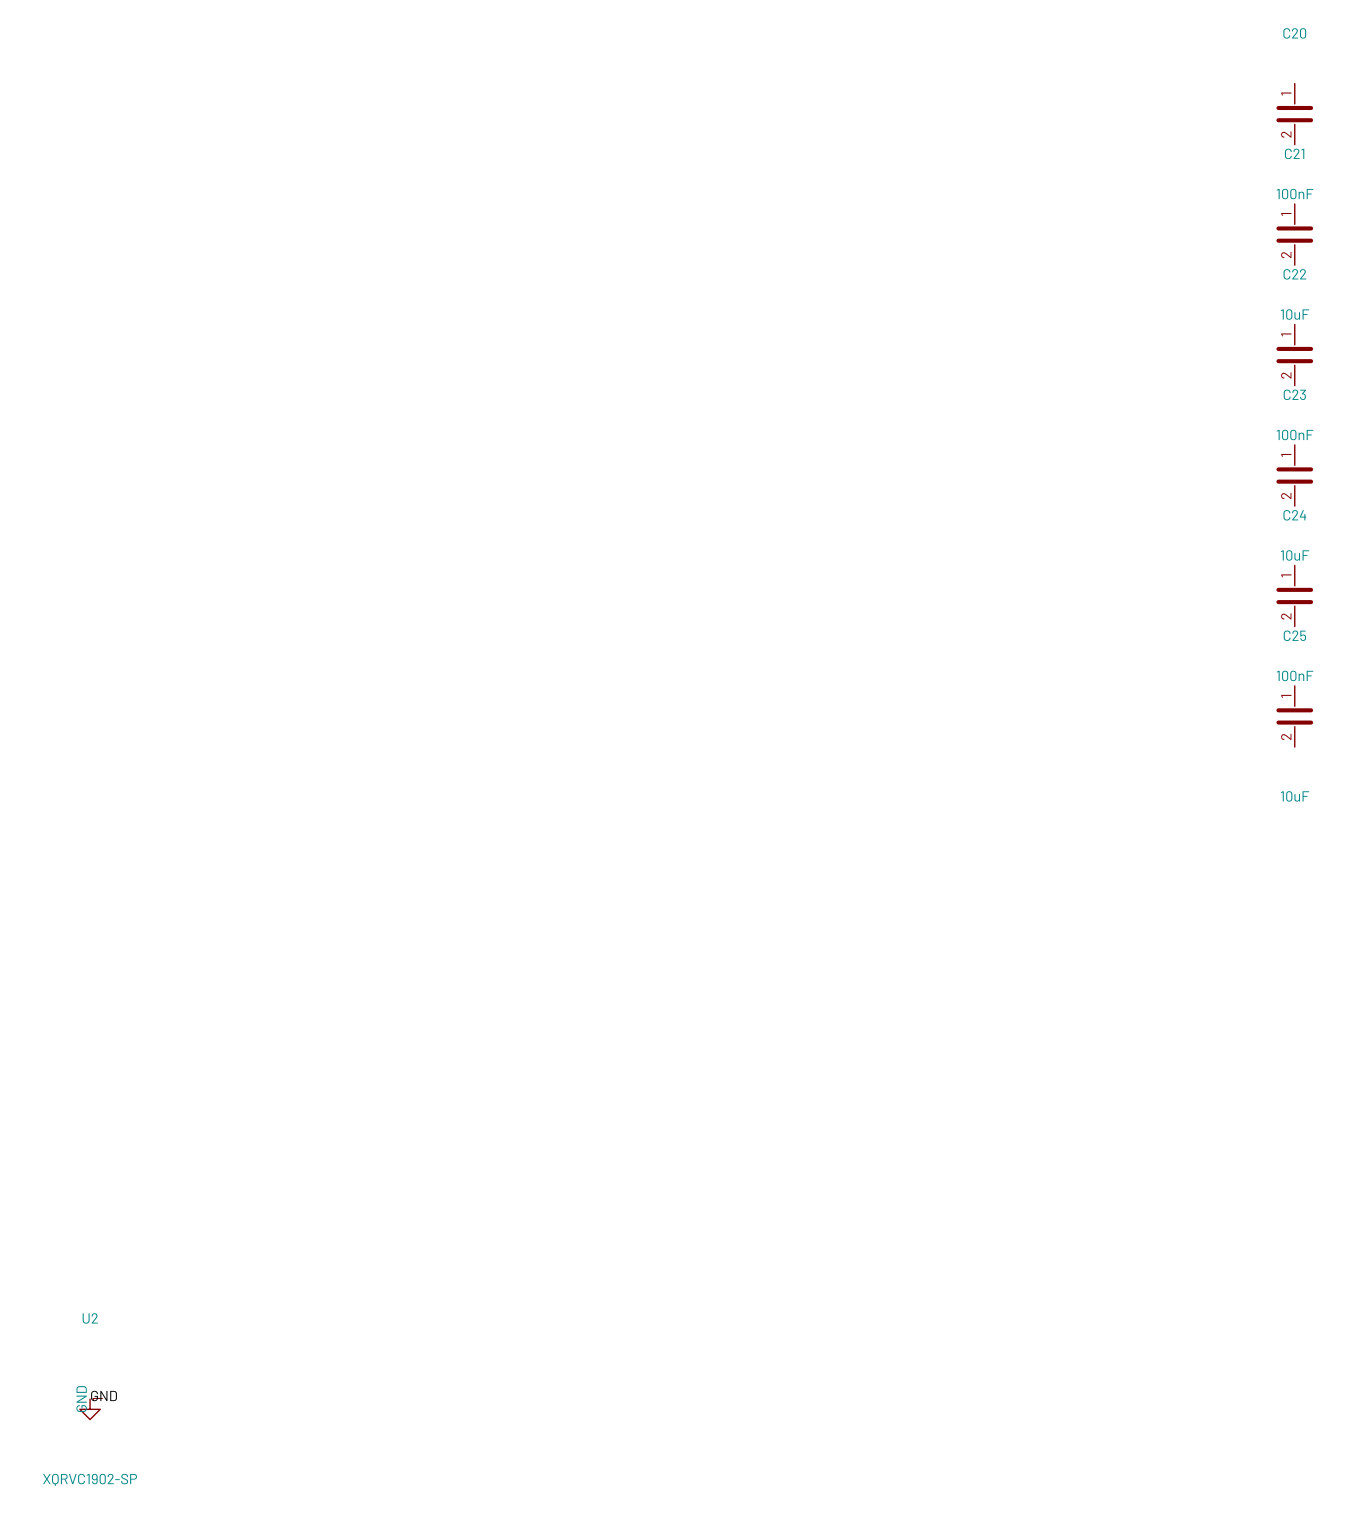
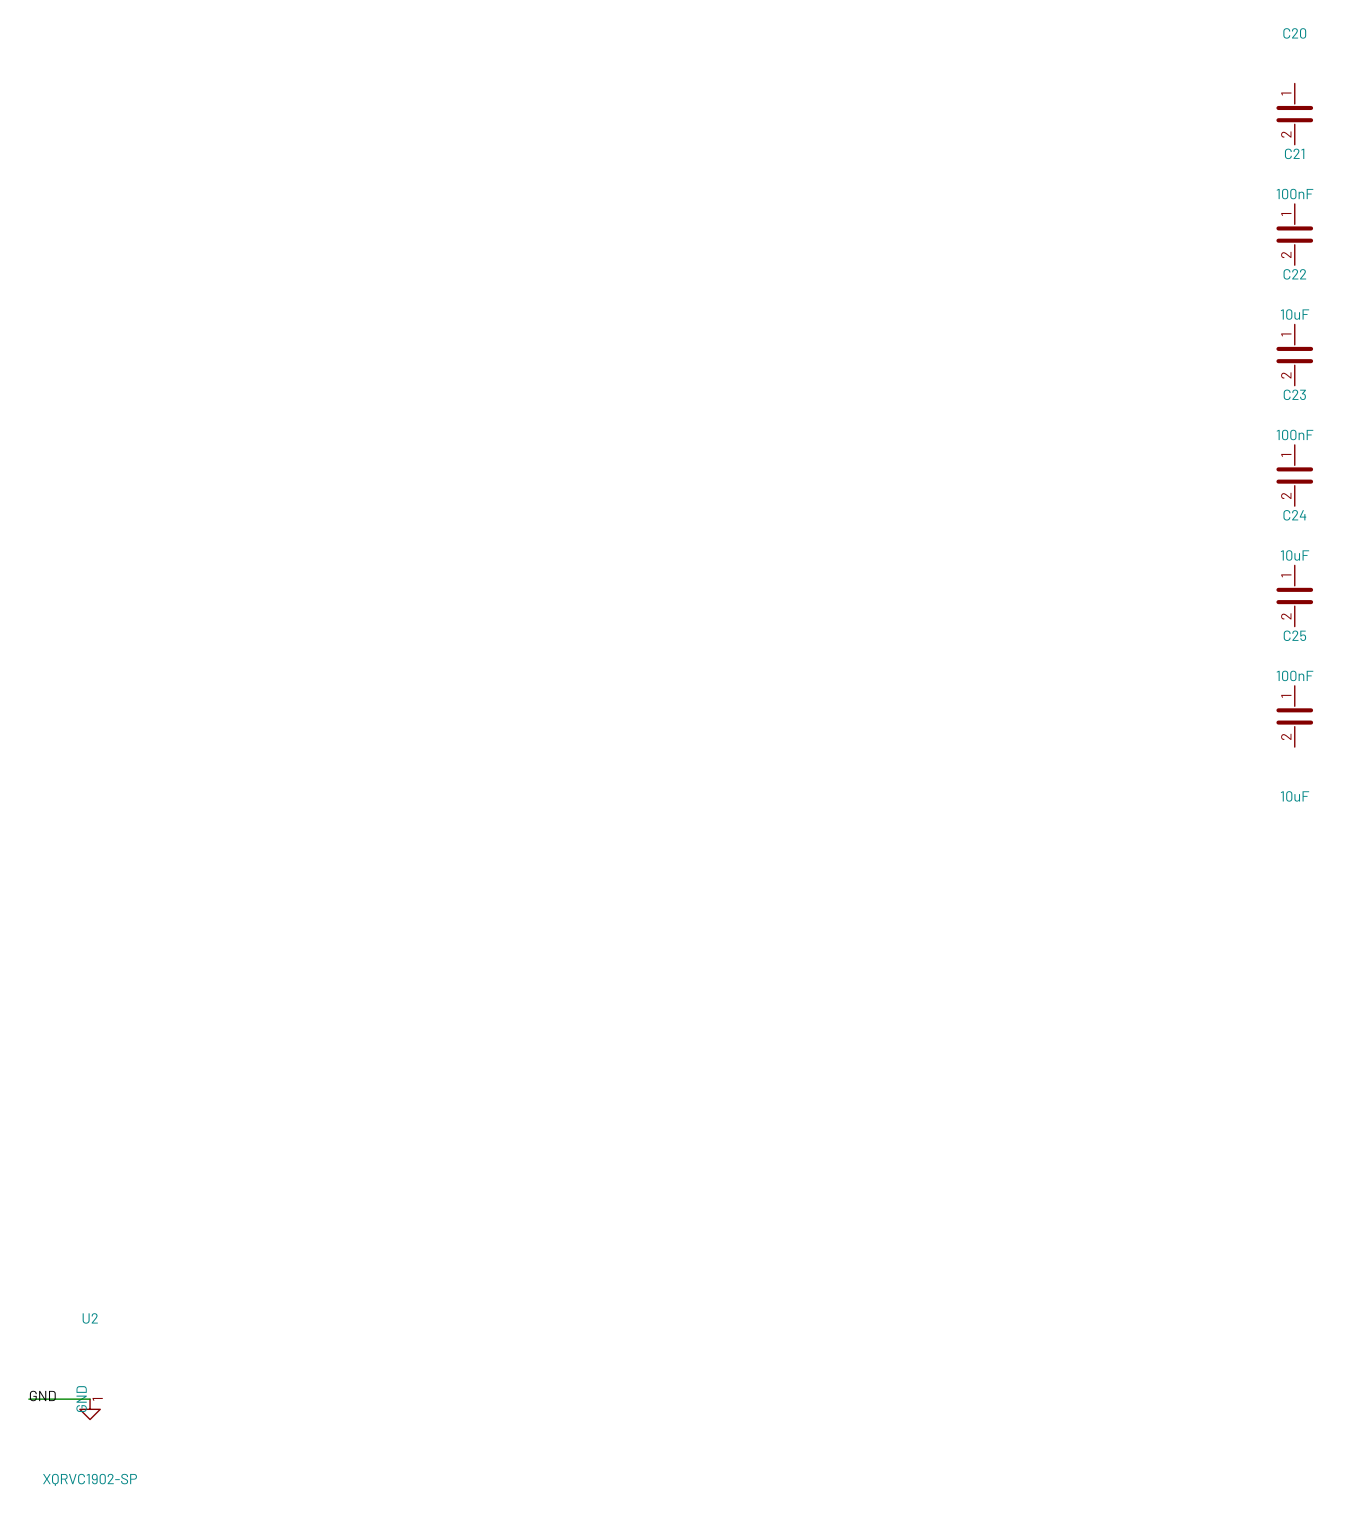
label position: GND (104, 1396) -> GND (42, 1396)
wire: none -> (28, 1399) (90, 1399)

